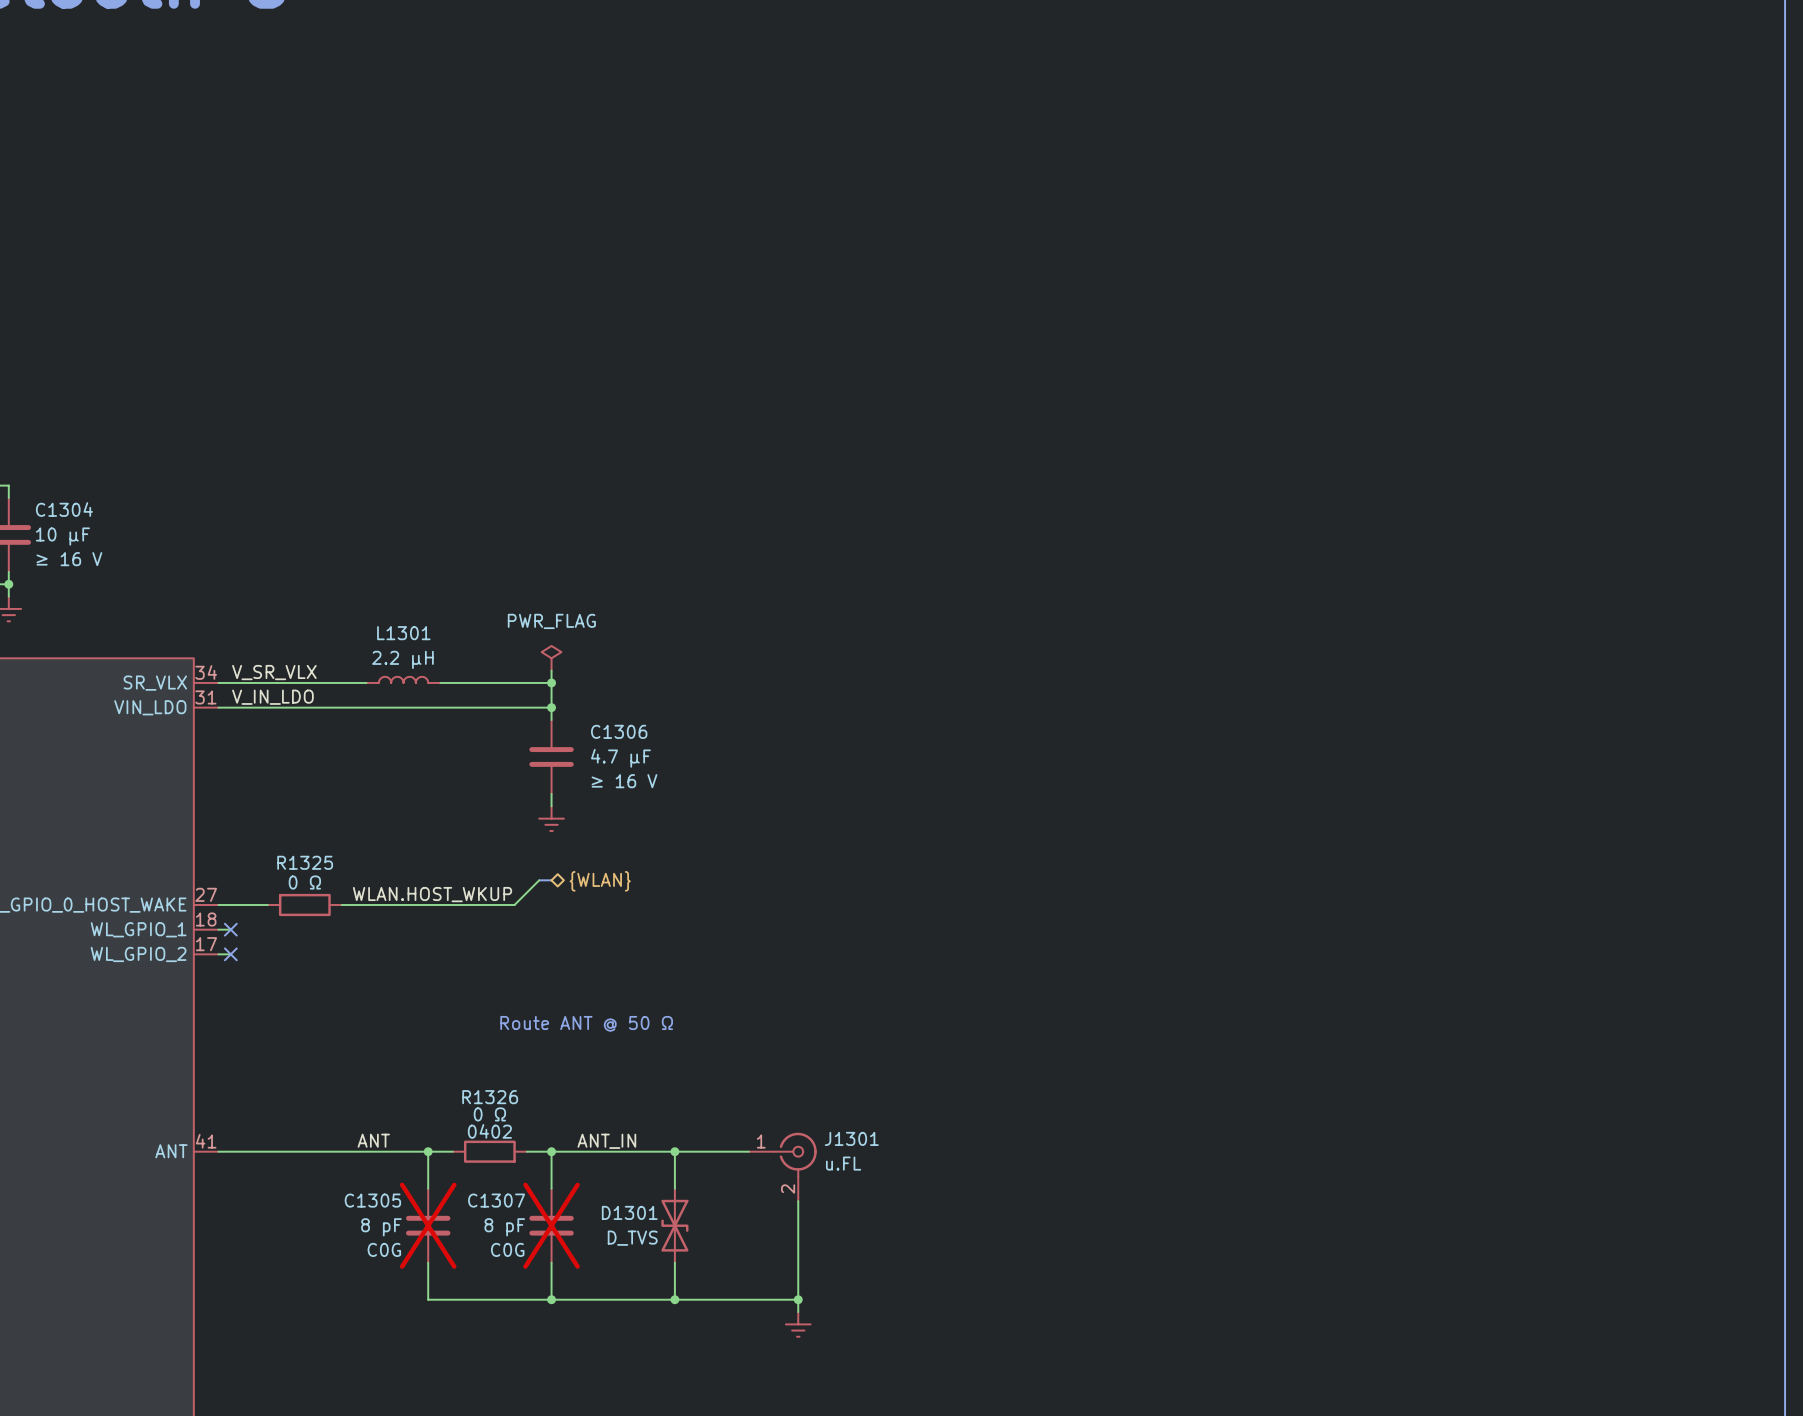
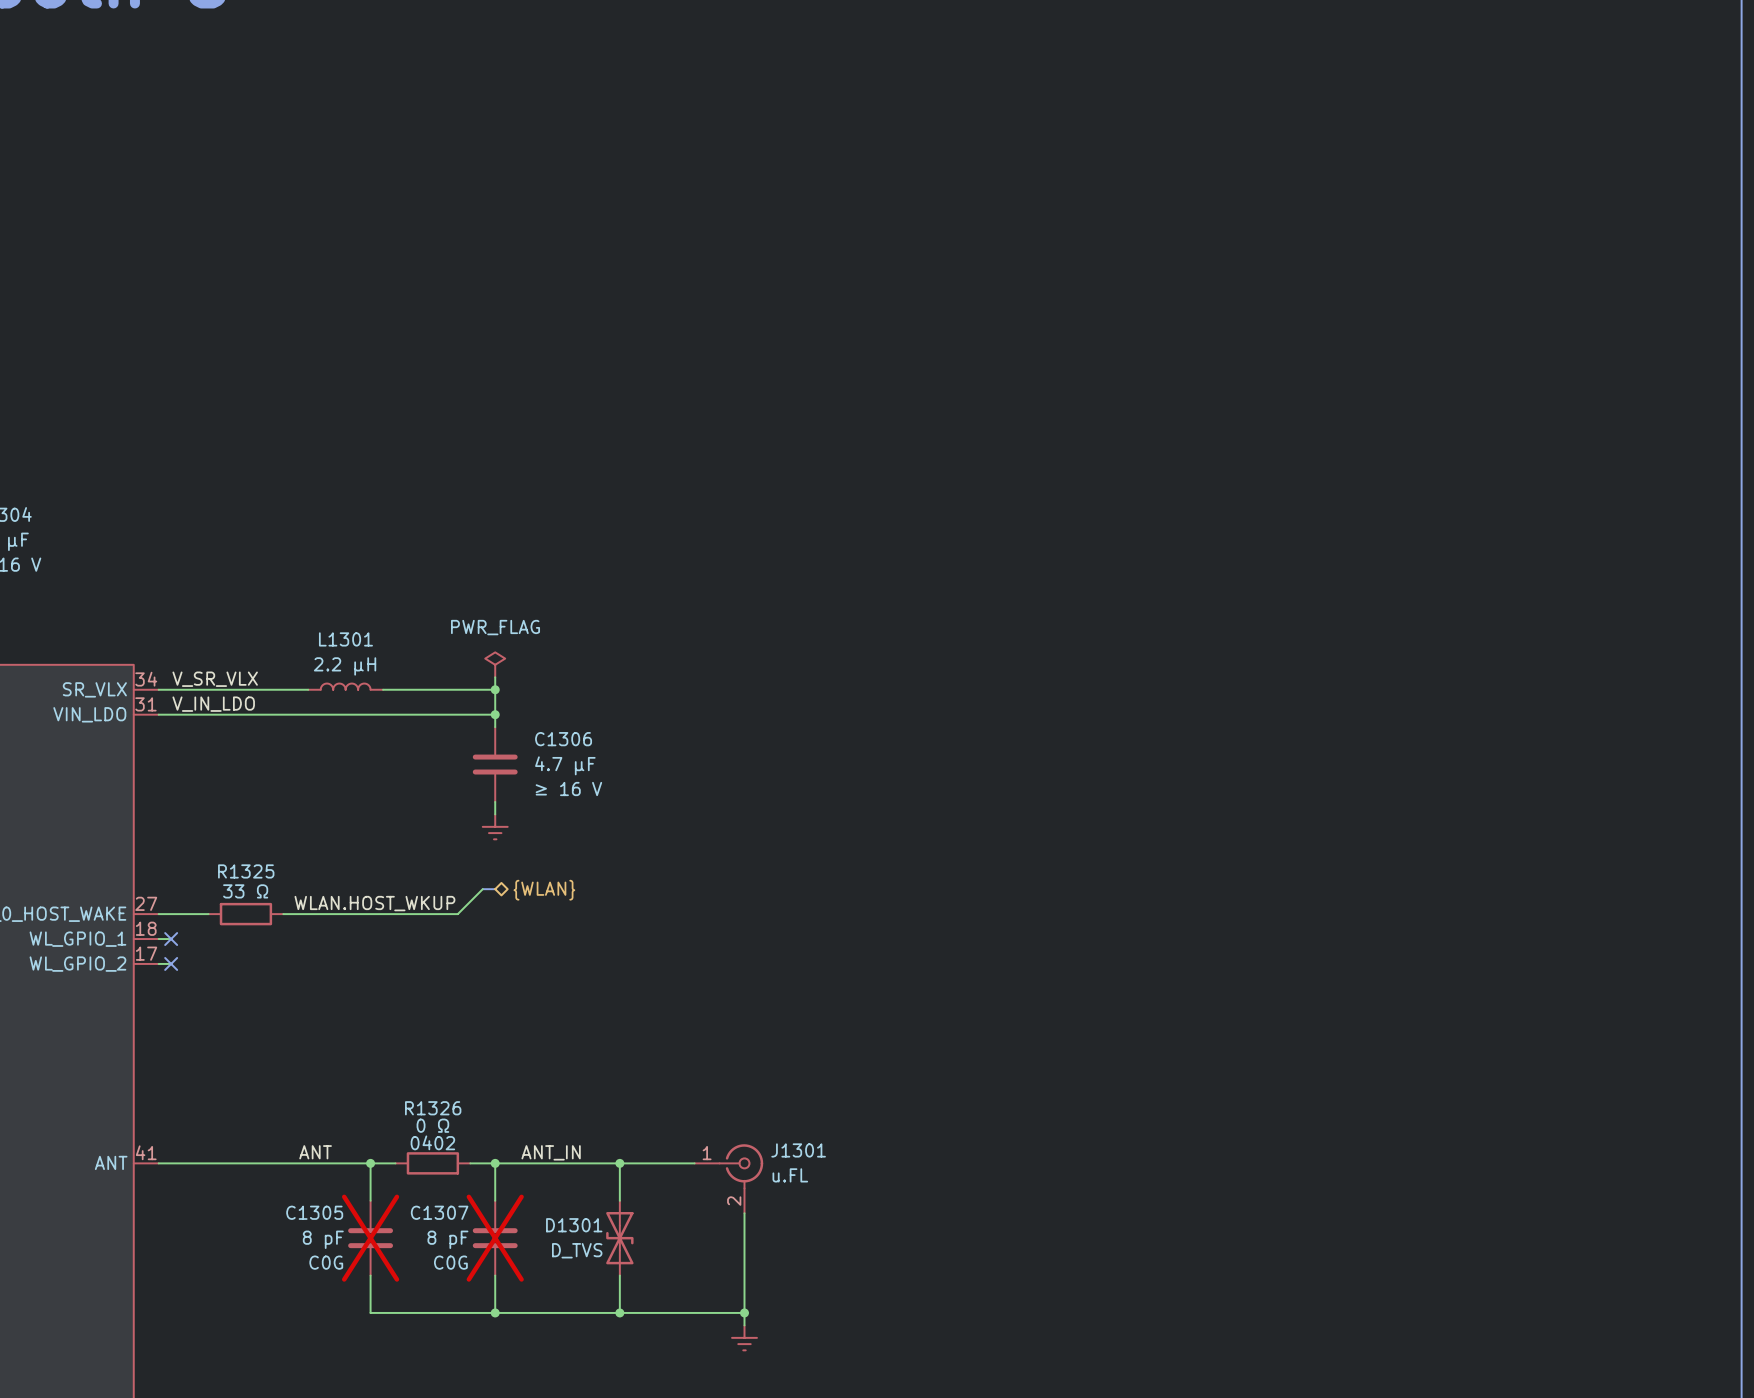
R1325 value: 0 Ω (304, 882) -> 33 Ω (245, 891)
text: Route ANT @ 50 Ω (586, 1023) -> none

